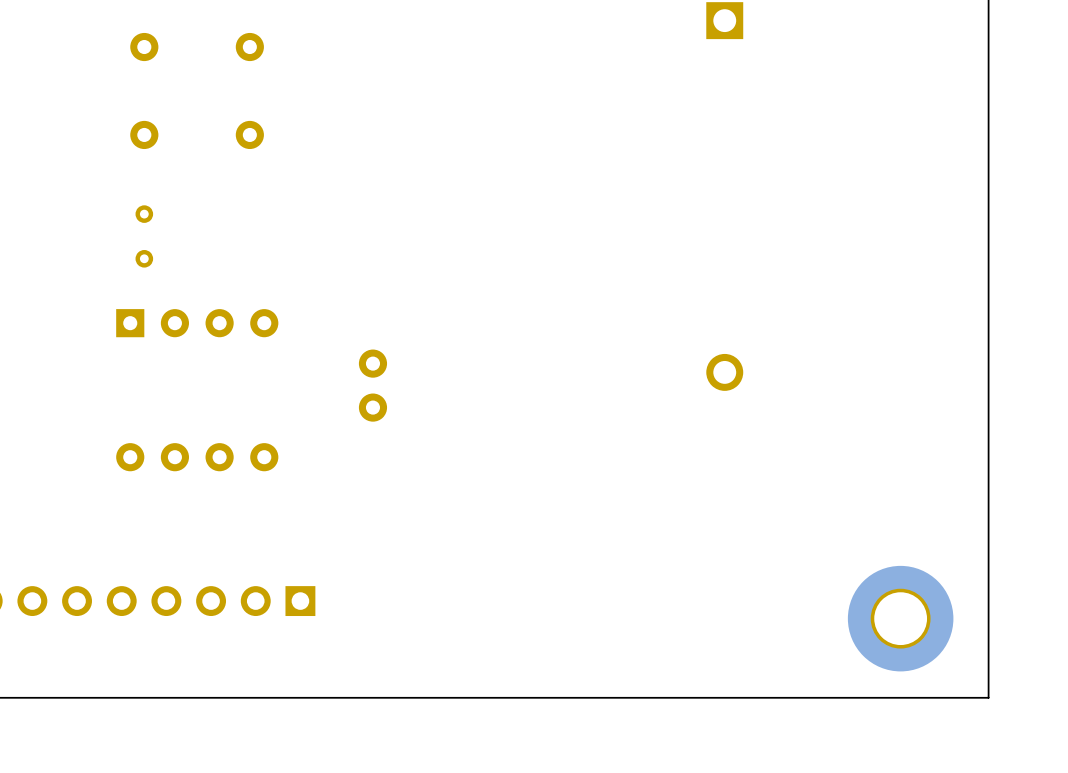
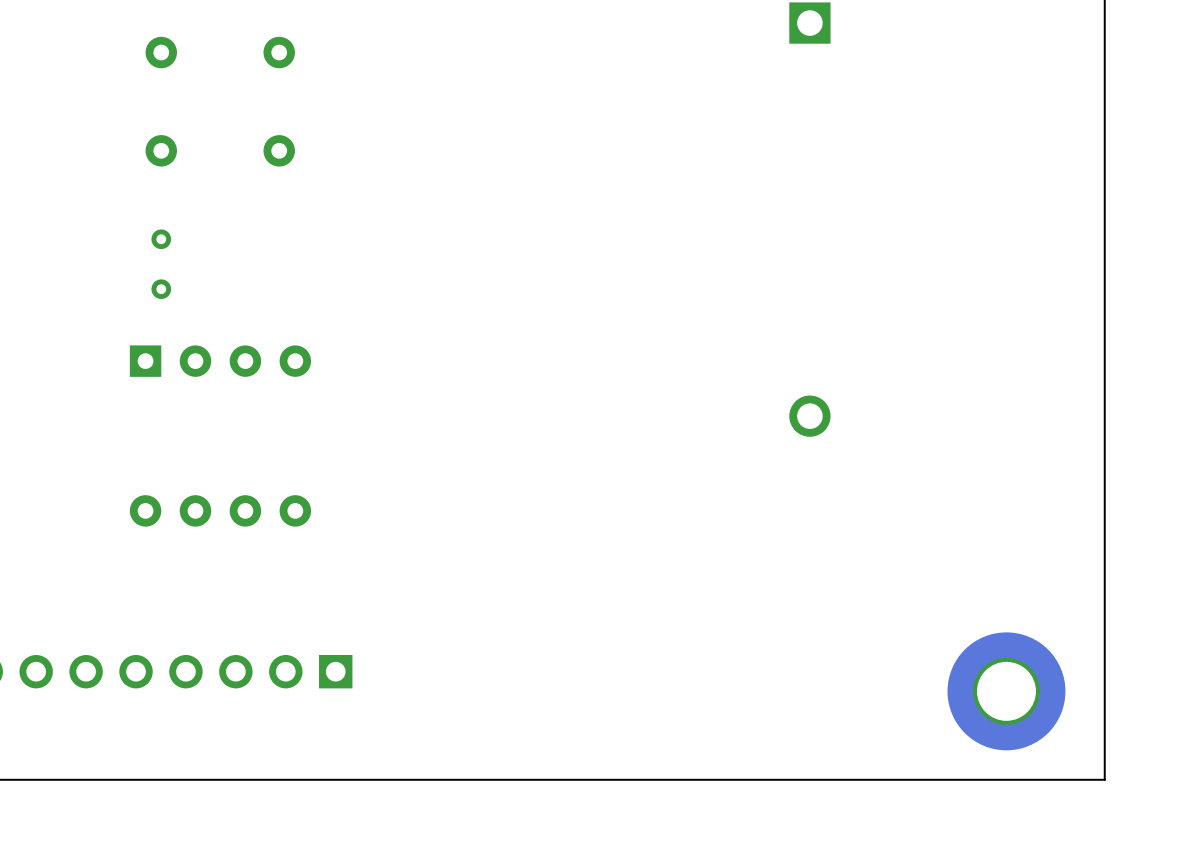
part: (372, 385) -> none

